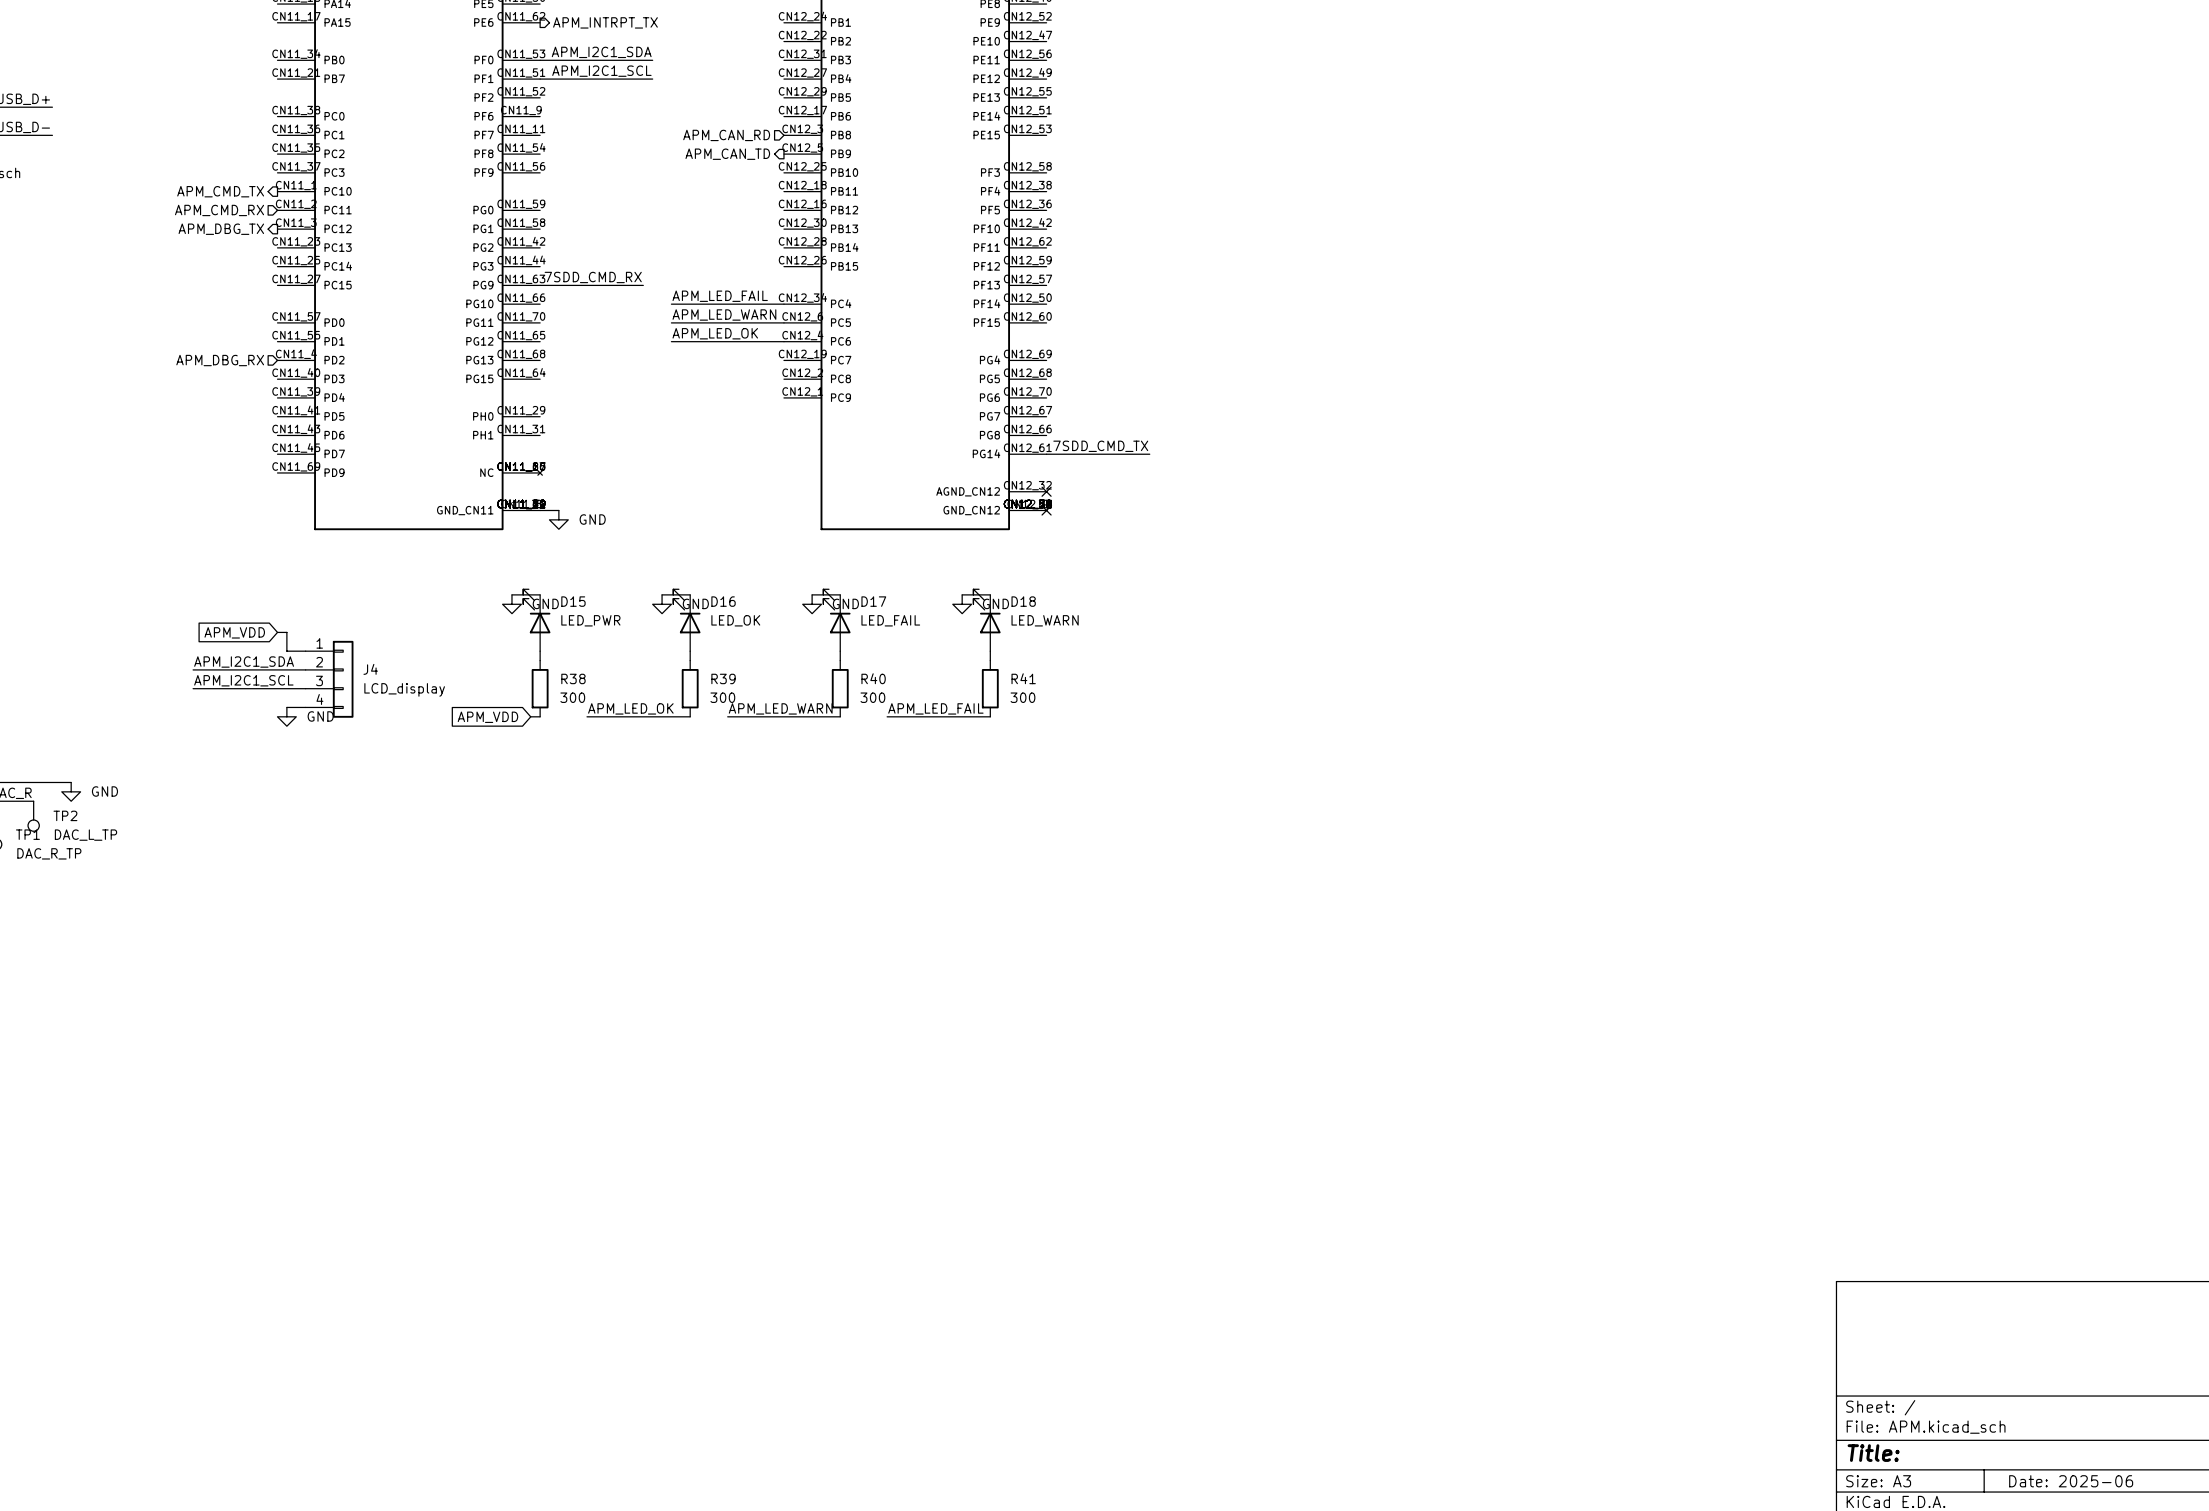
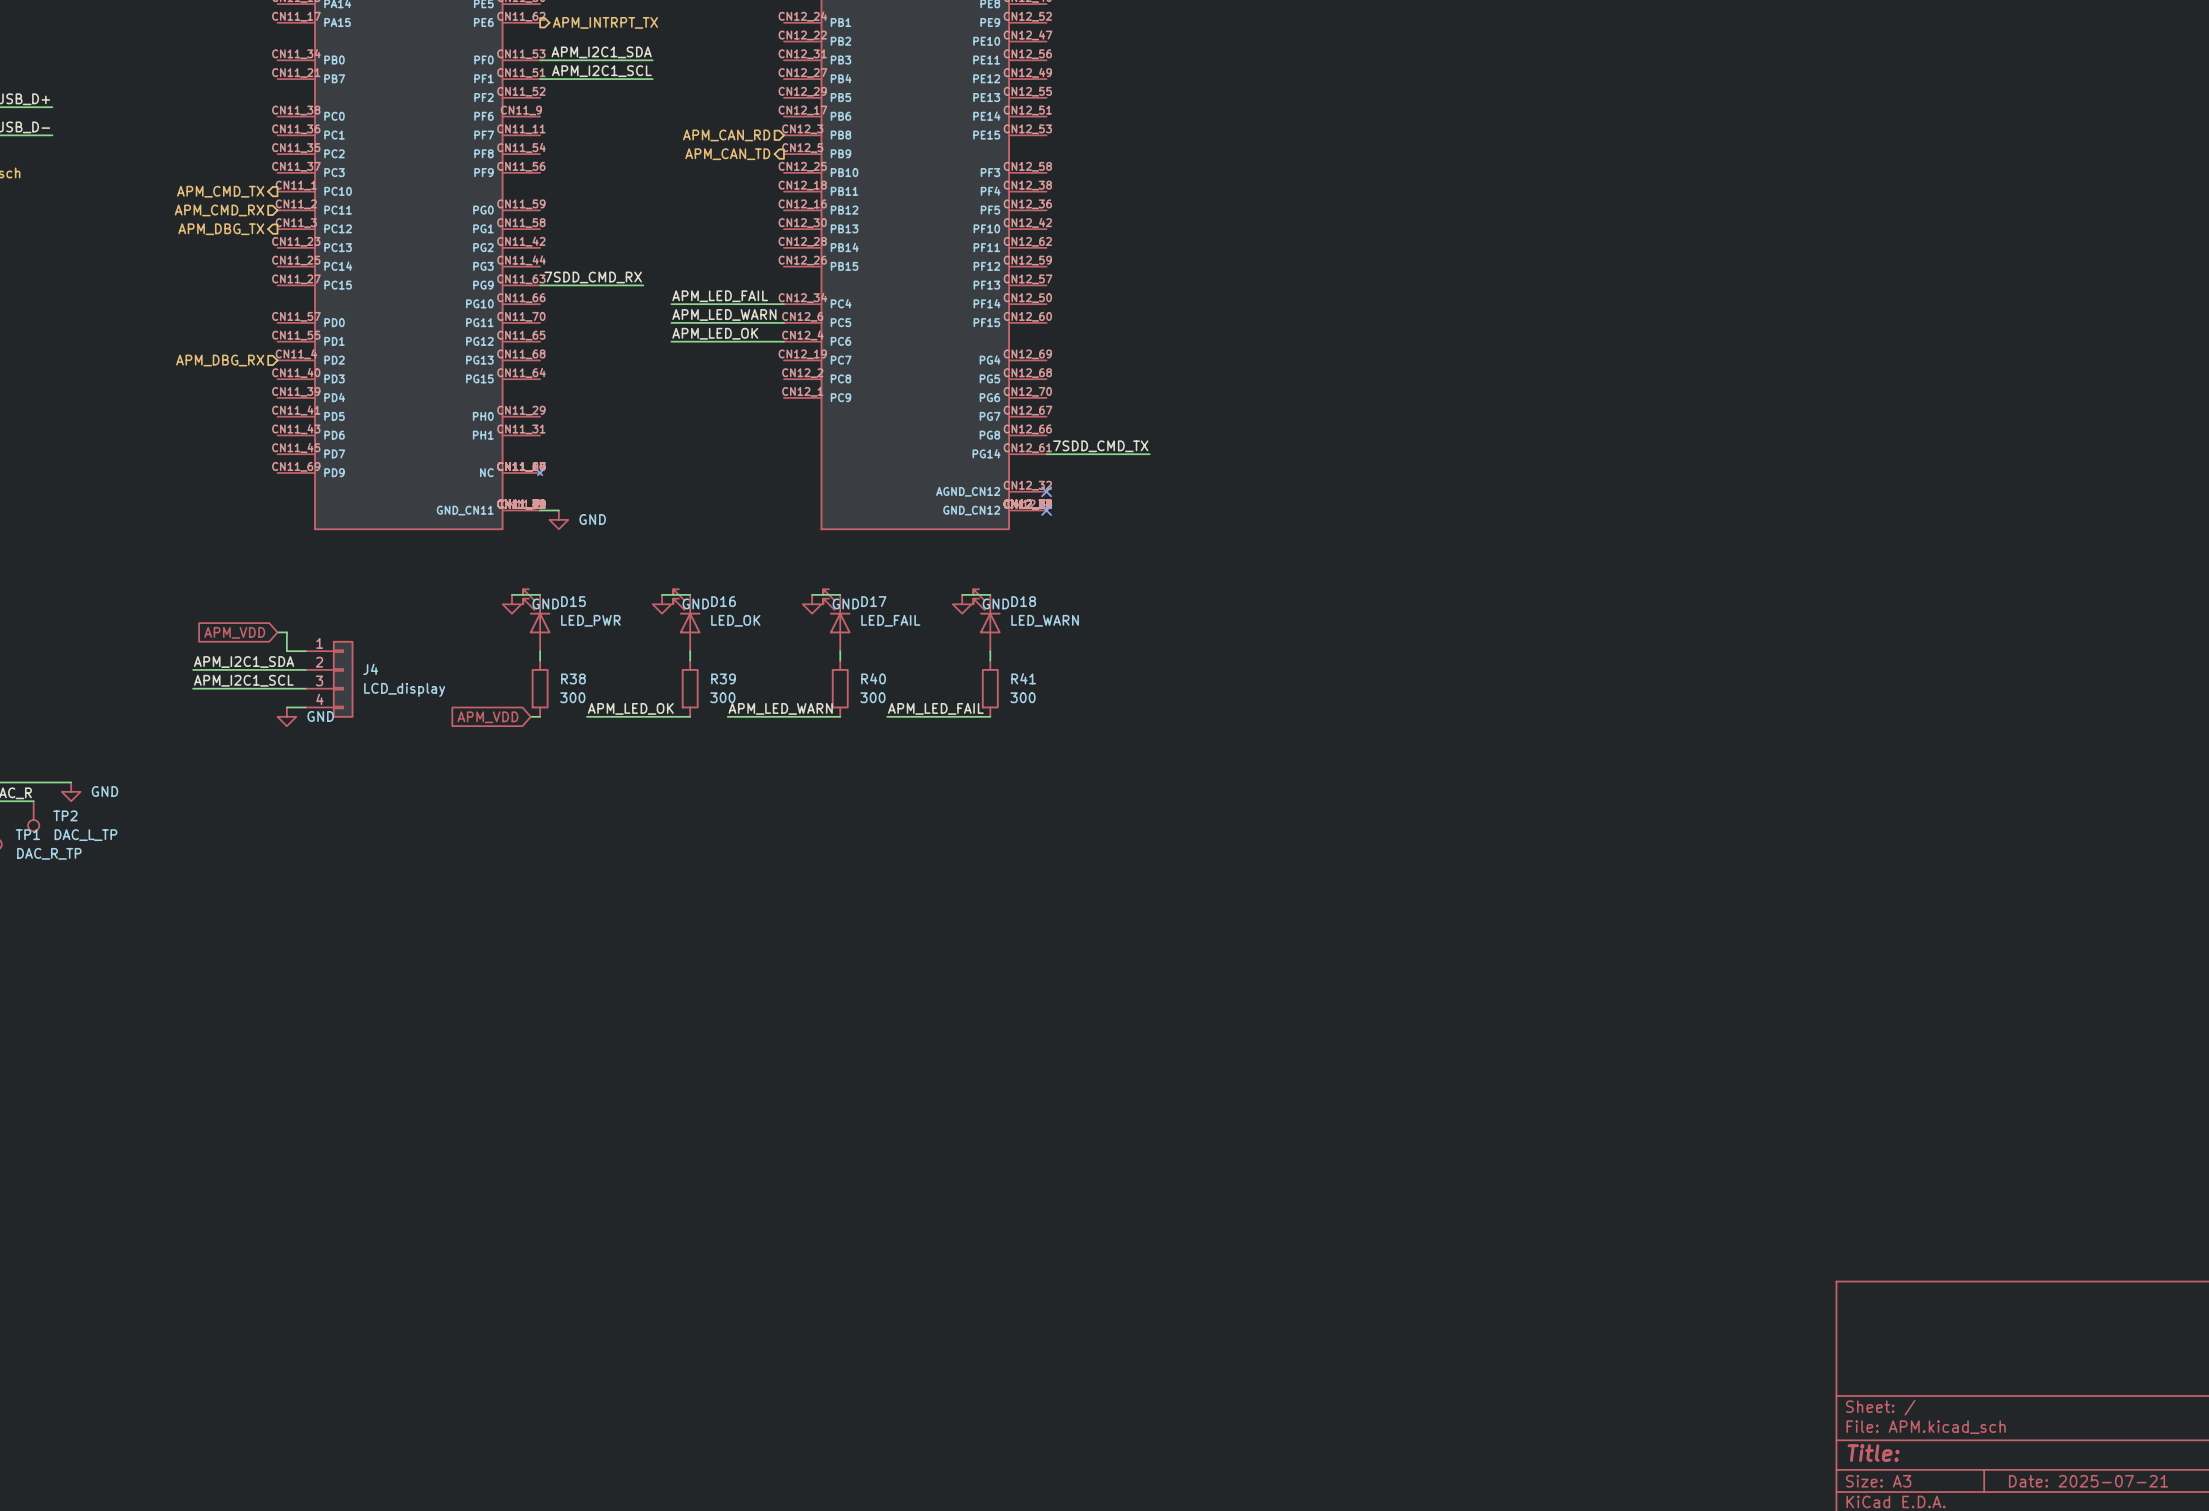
title block: Date: 2025-06 (2071, 1481) -> Date: 2025-07-21 (2088, 1481)

